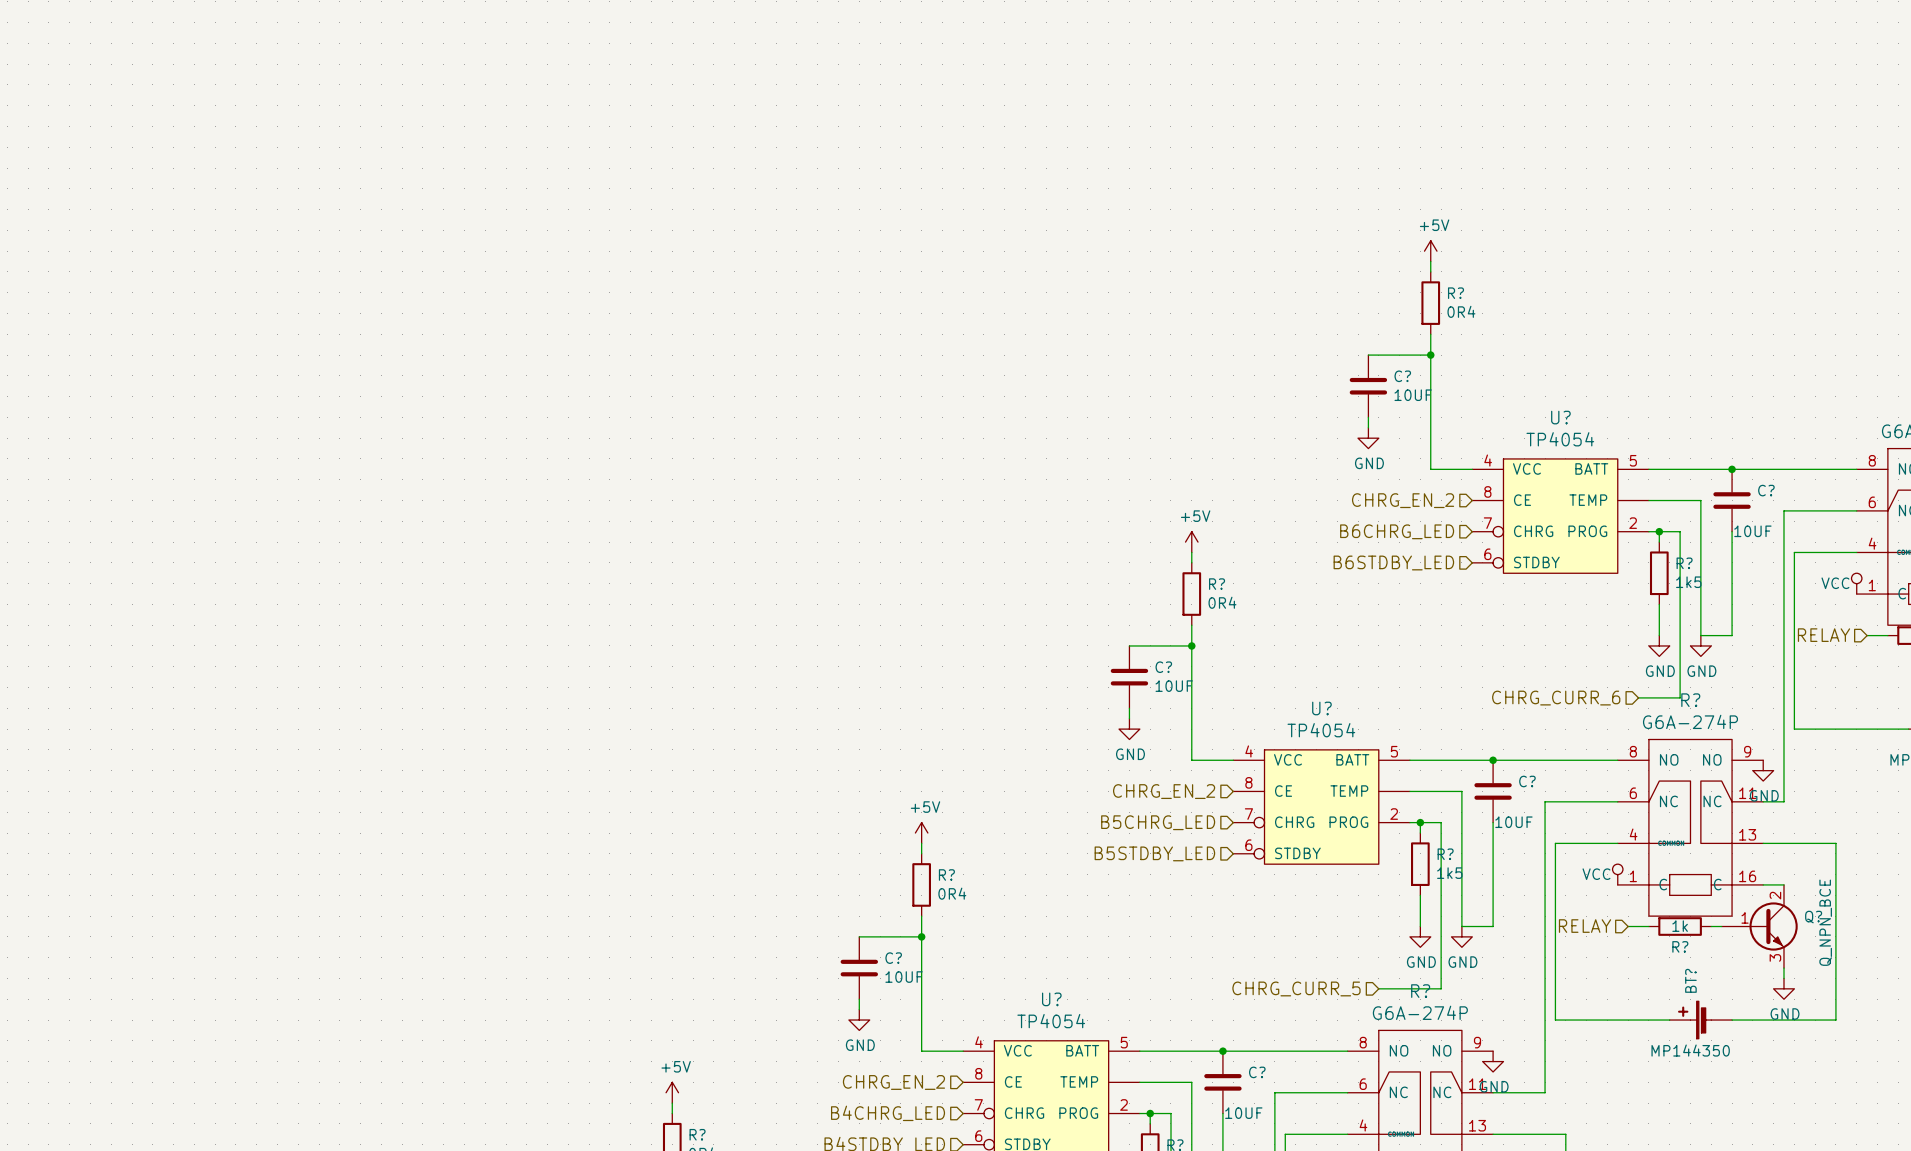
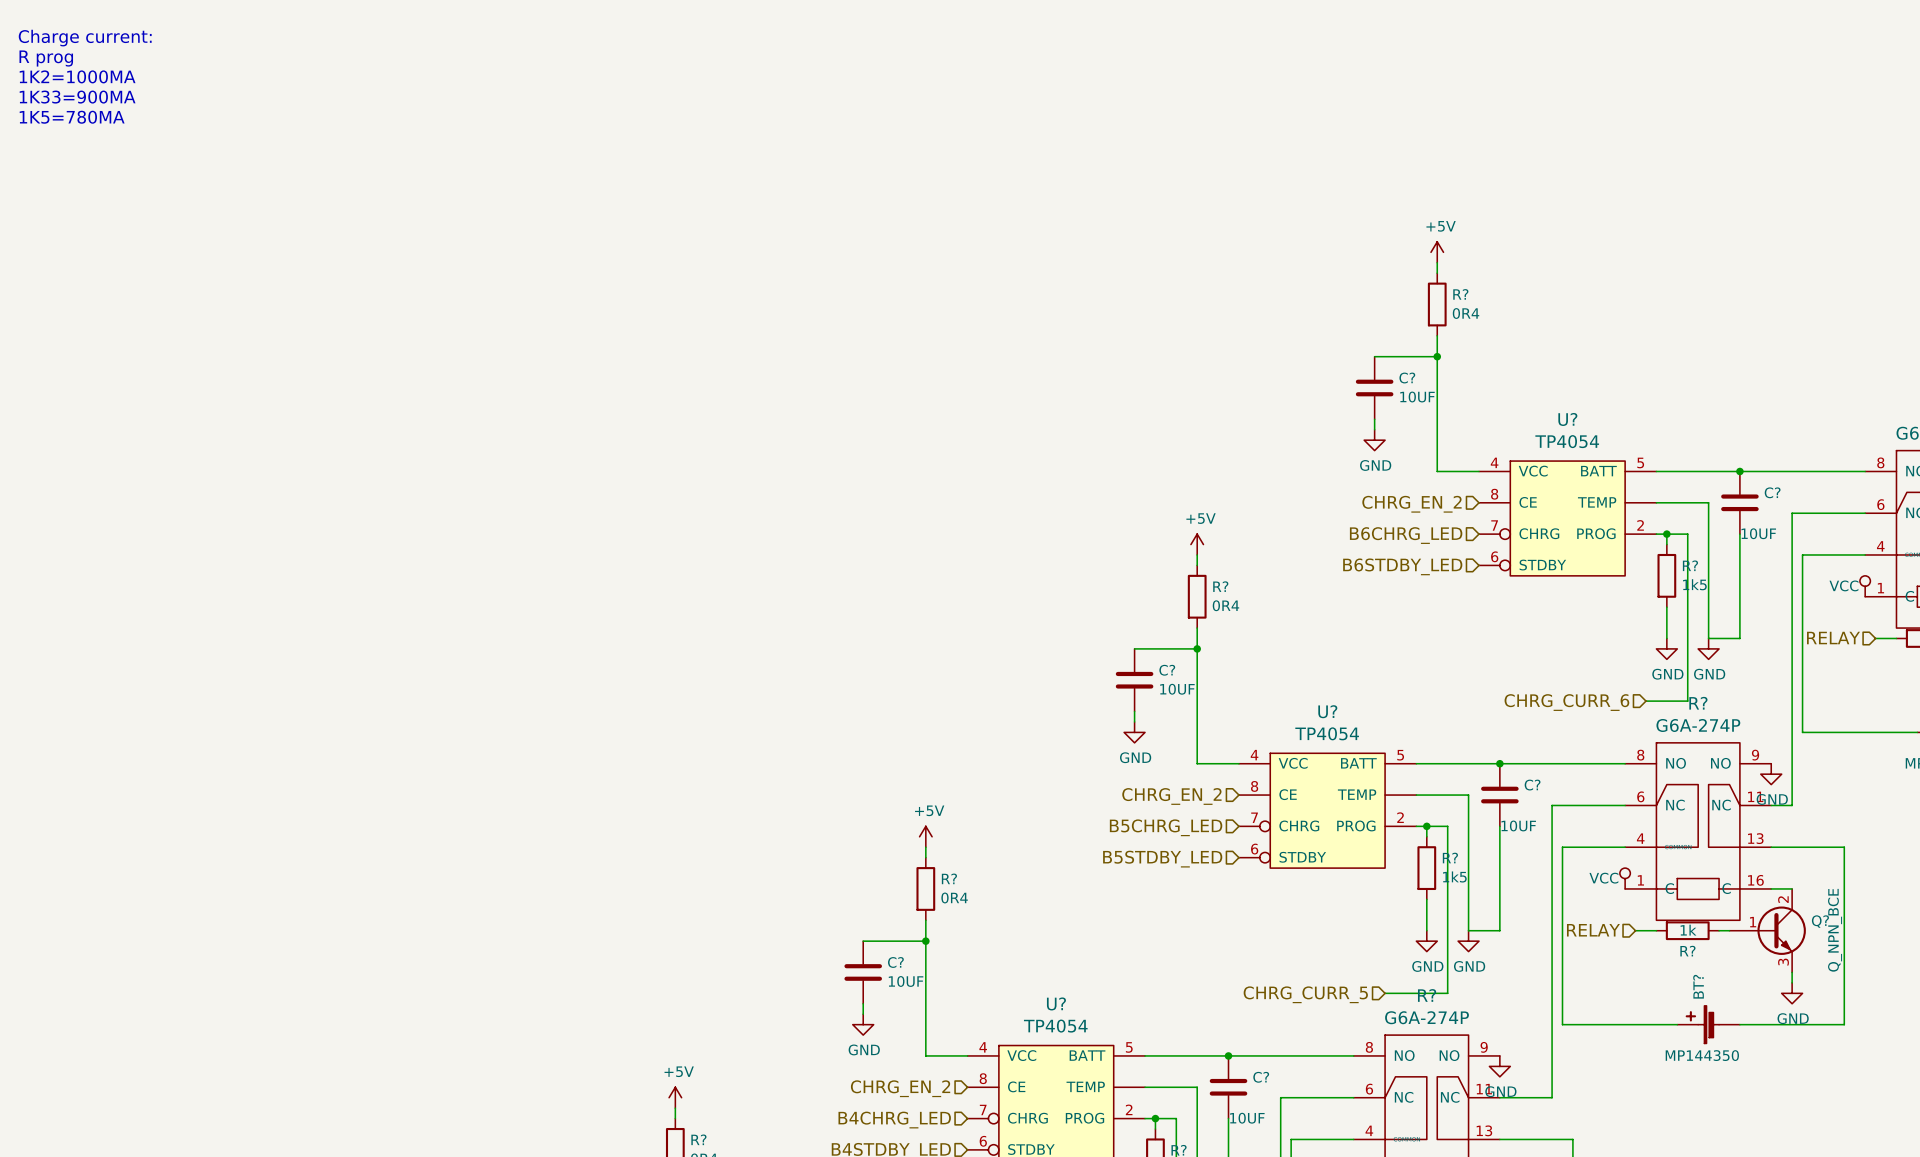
text: none -> Charge current: (85, 38)
text: none -> R prog (46, 58)
text: none -> 1K2=1000MA (77, 76)
text: none -> 1K33=900MA (77, 97)
text: none -> 1K5=780MA (72, 117)

